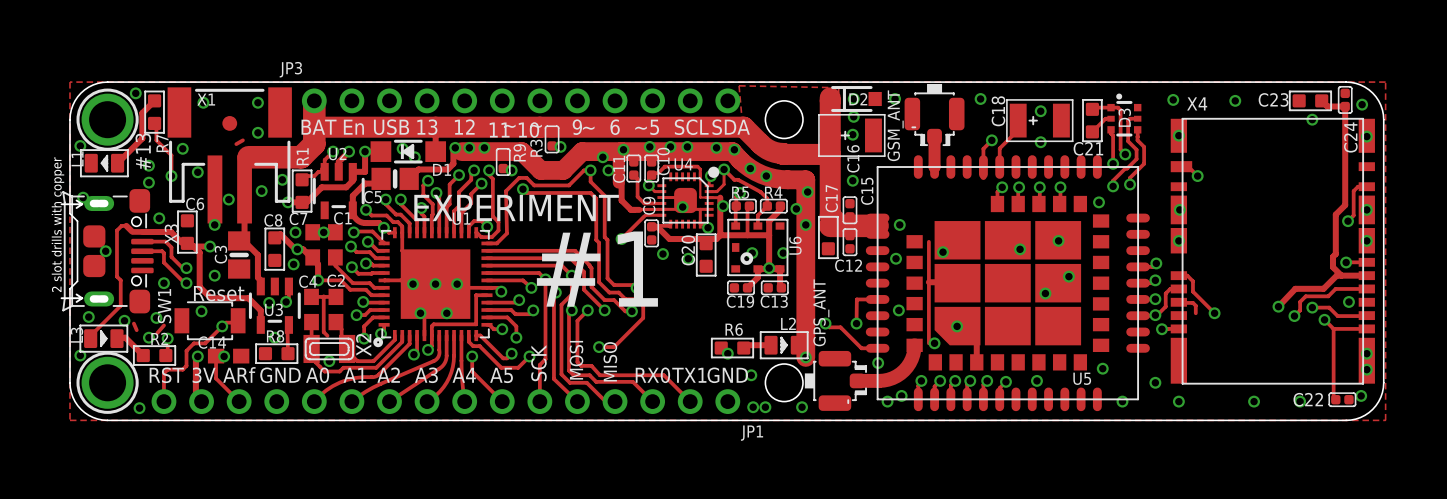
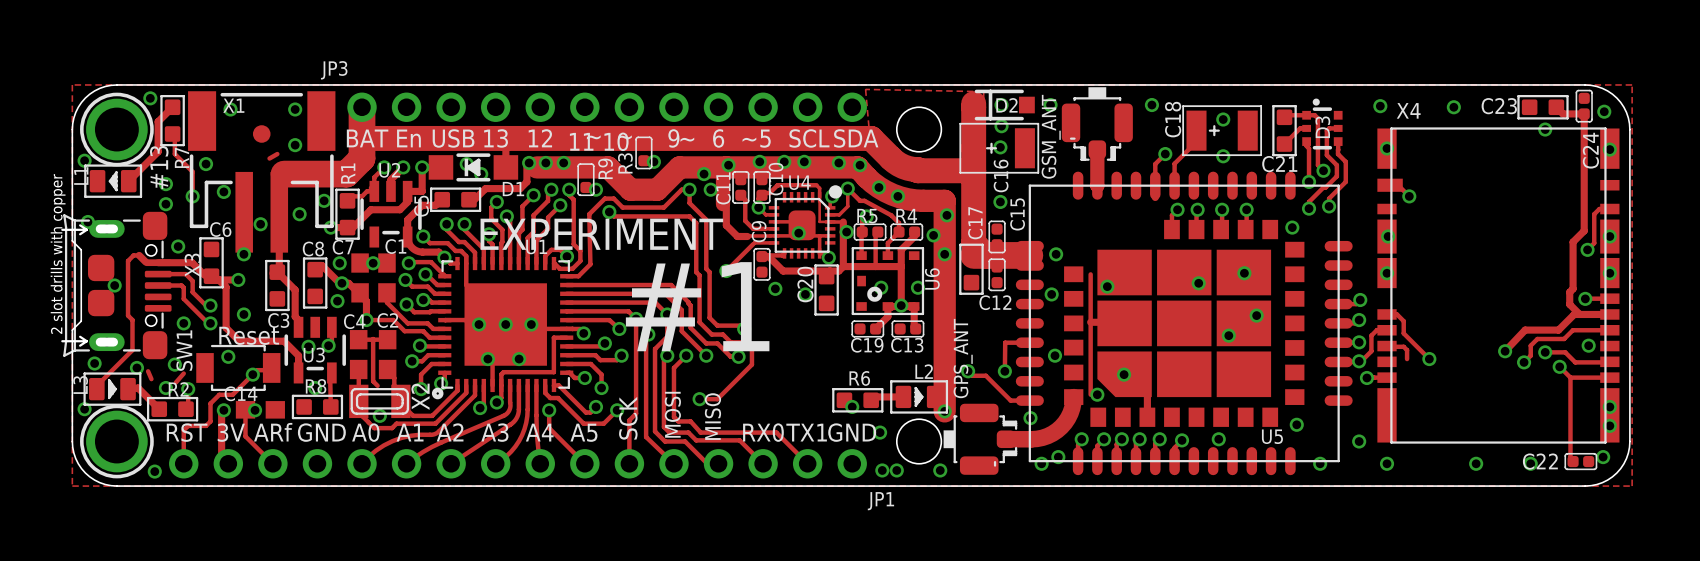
C5 footprint: [371, 167, 419, 190] -> [429, 187, 482, 212]
C3 footprint: [228, 231, 251, 279] -> [265, 259, 290, 312]
C3 name position: C3 (220, 254) -> C3 (278, 320)

